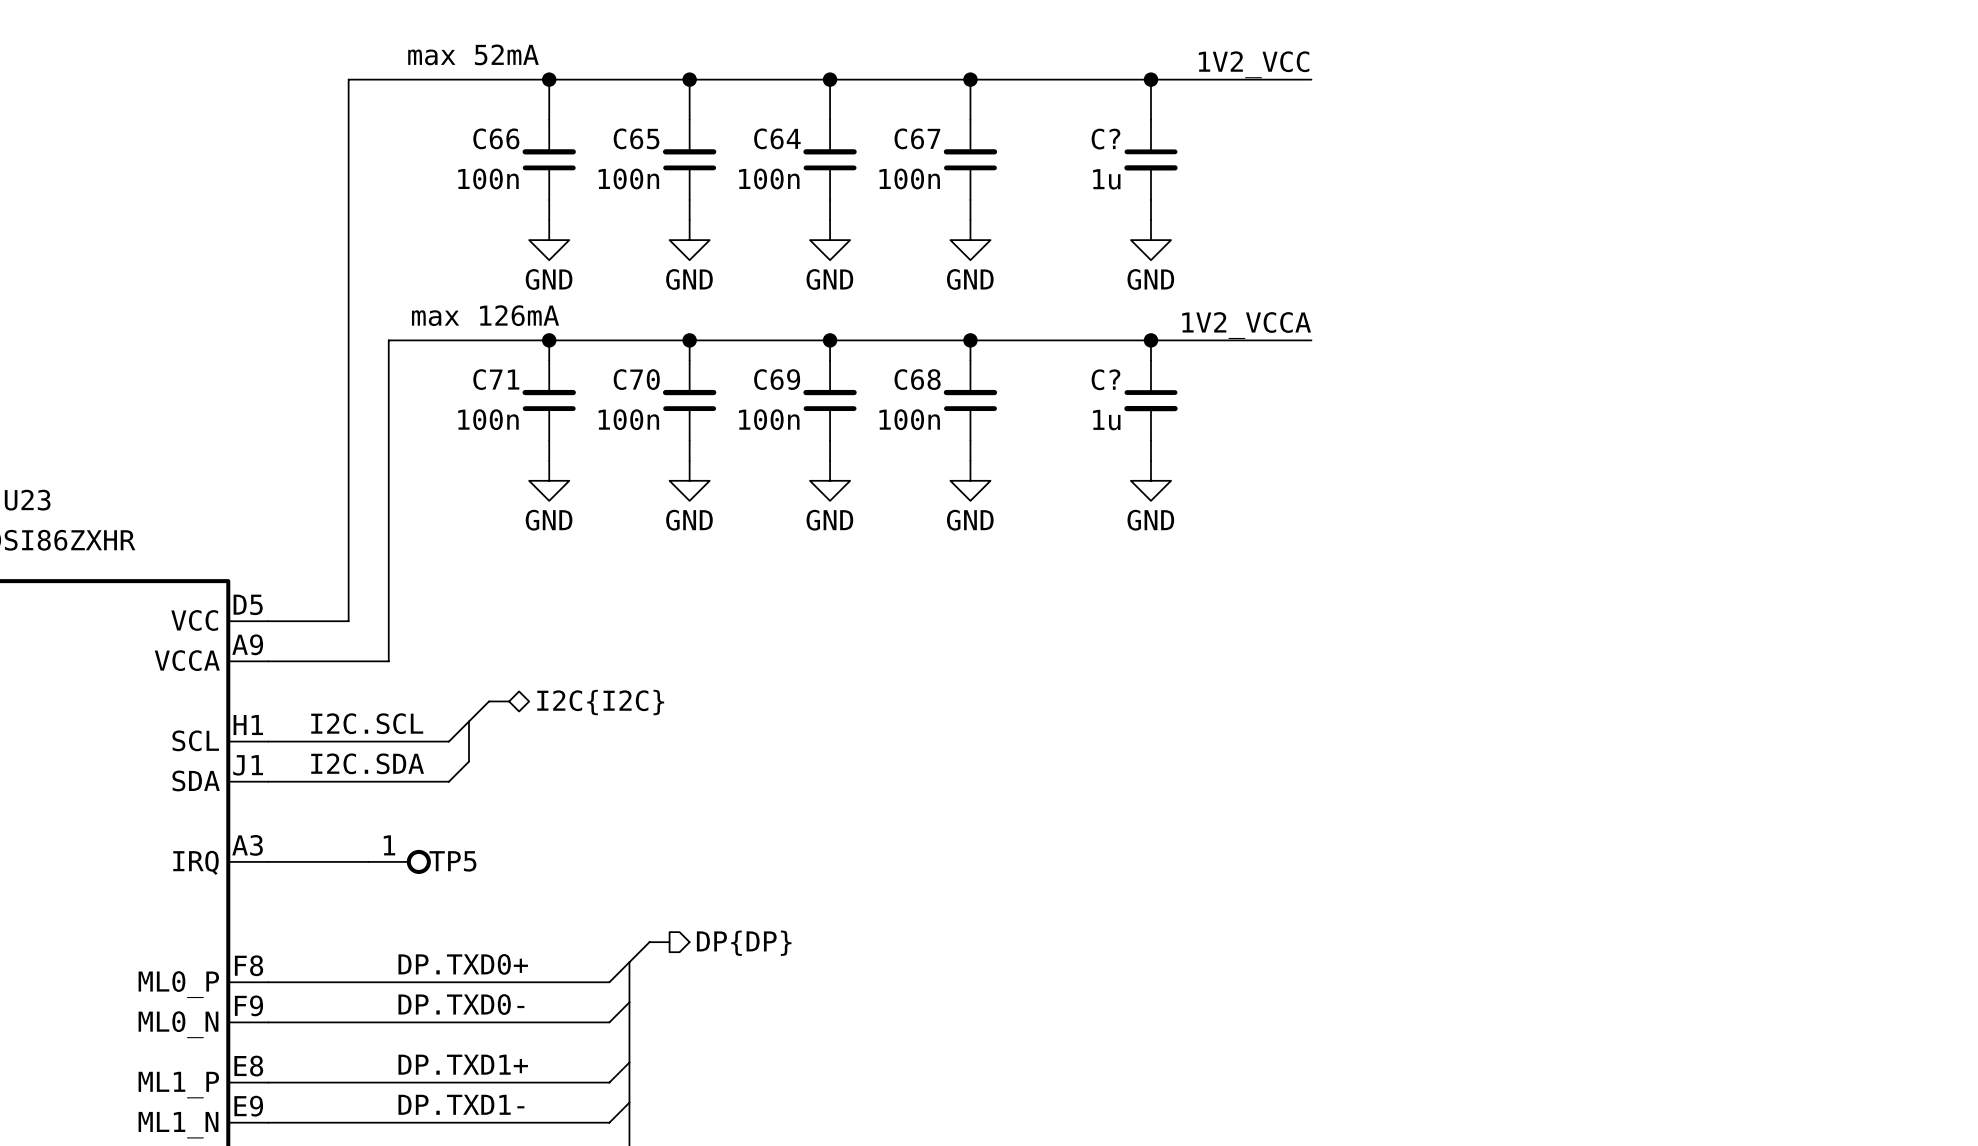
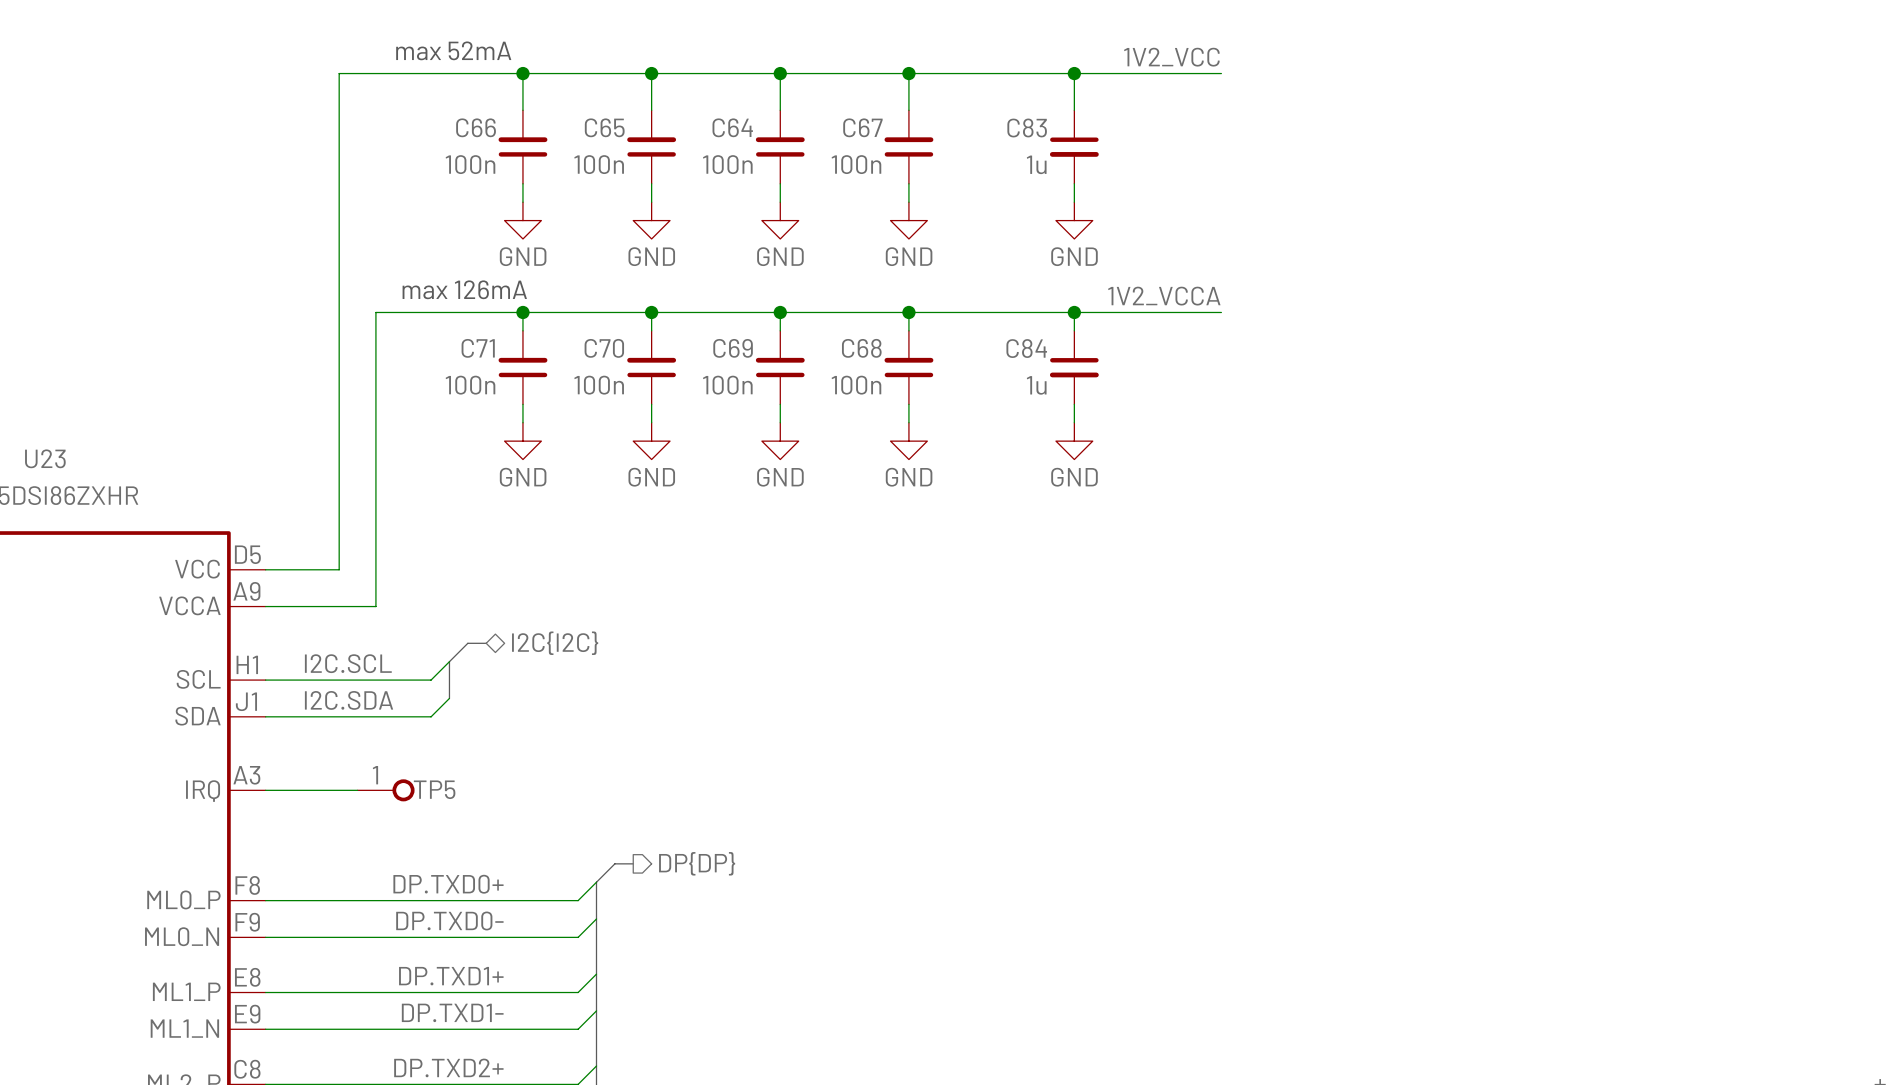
C? name: C? (1105, 139) -> C83 (1027, 127)
C? name: C? (1105, 379) -> C84 (1026, 348)

